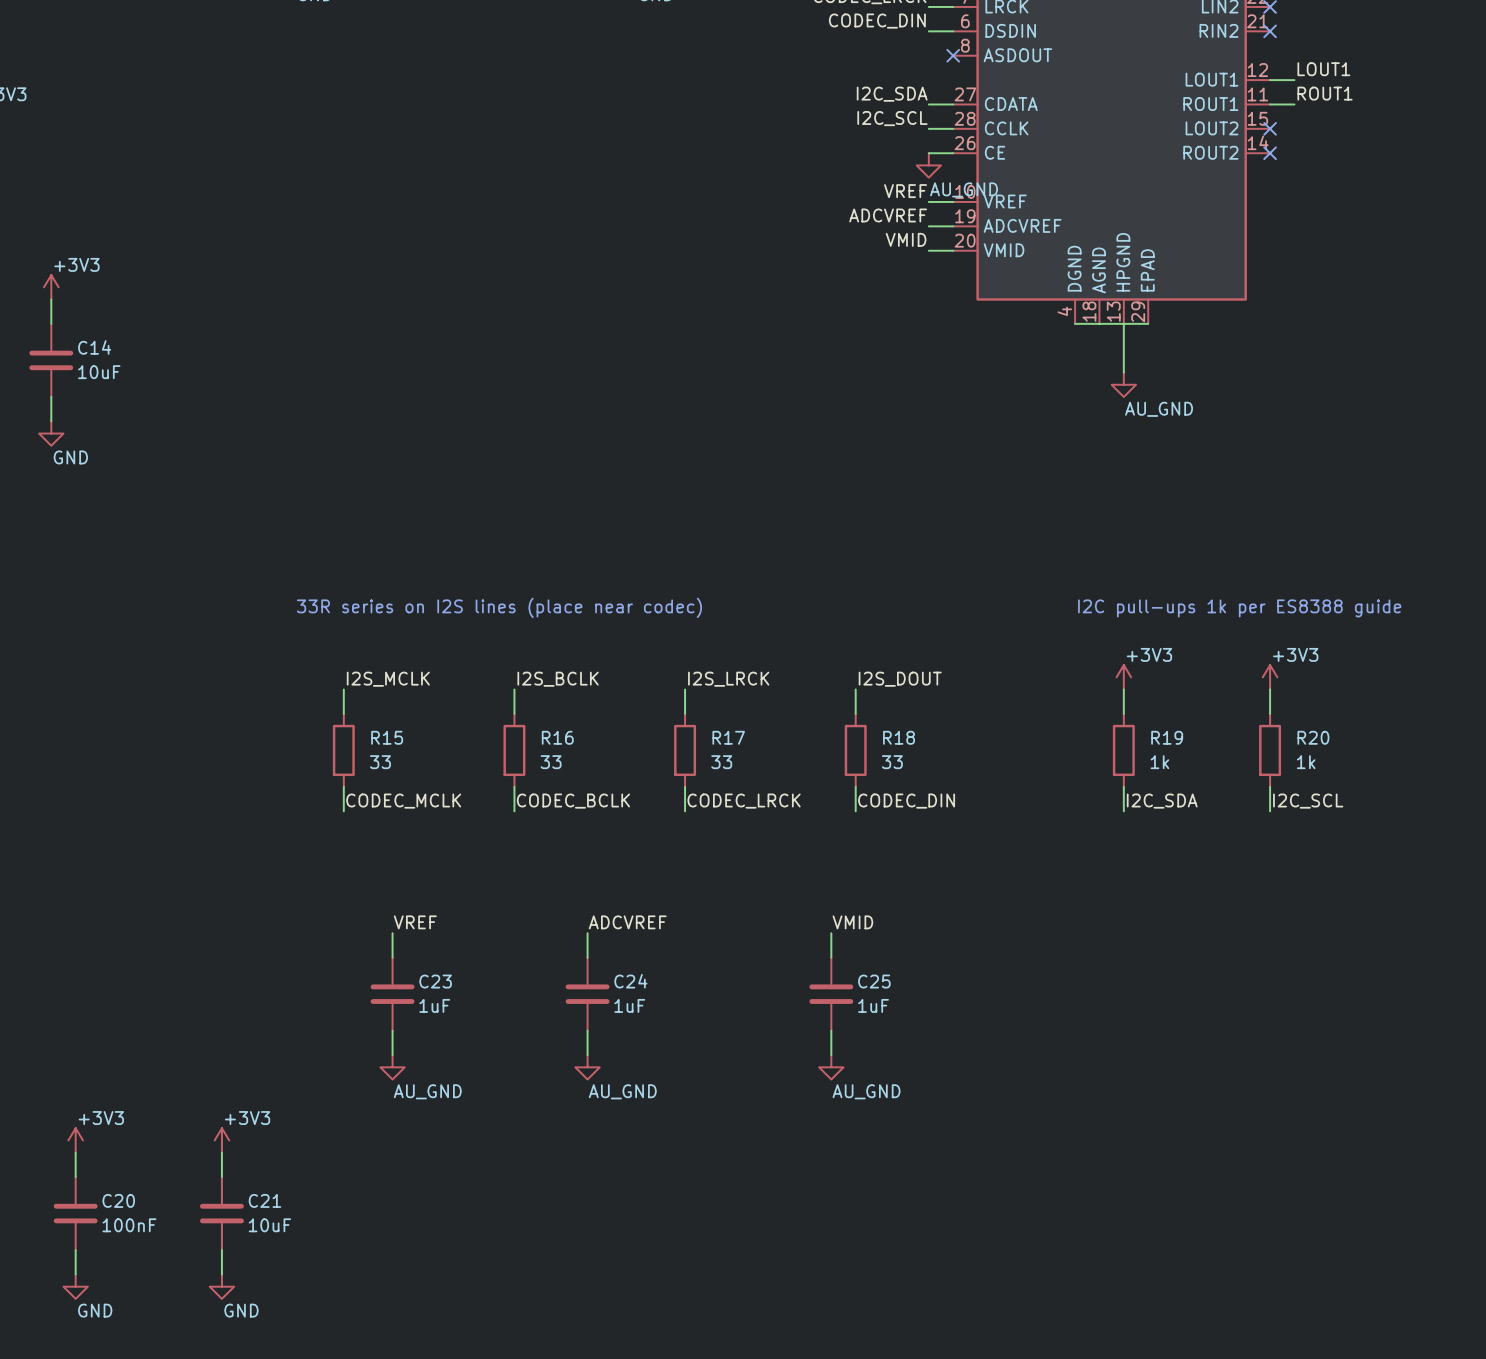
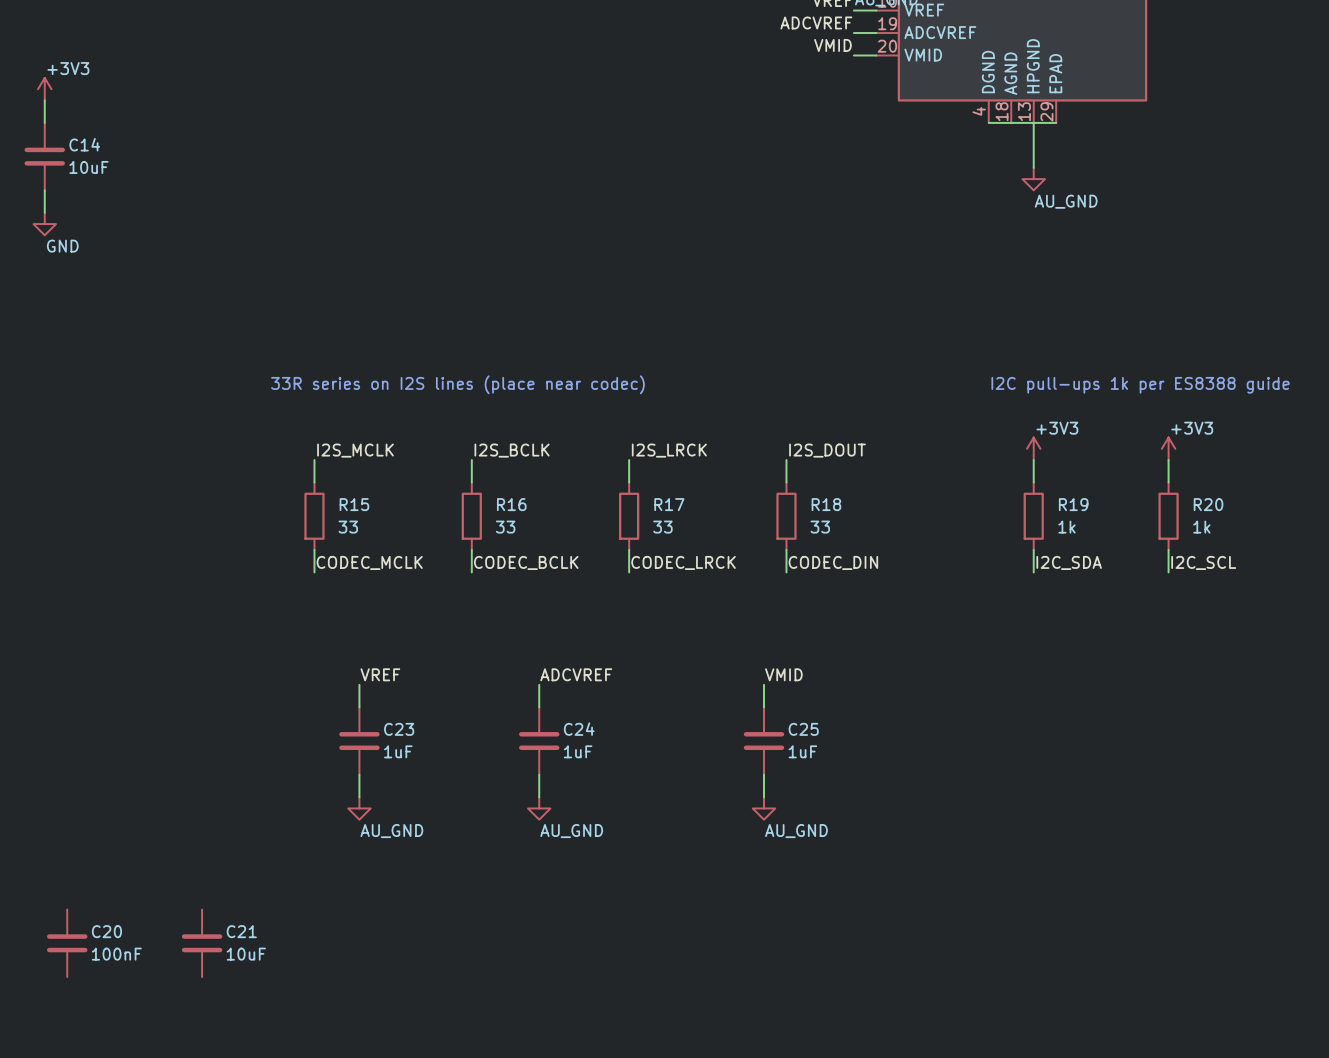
power symbol: +3V3 (75, 1140) -> none
power symbol: +3V3 (221, 1140) -> none
wire: (75, 1152) (75, 1177) -> none
wire: (221, 1152) (221, 1177) -> none
wire: (75, 1250) (75, 1274) -> none
wire: (221, 1250) (221, 1274) -> none
power symbol: GND (75, 1286) -> none
power symbol: GND (221, 1286) -> none

